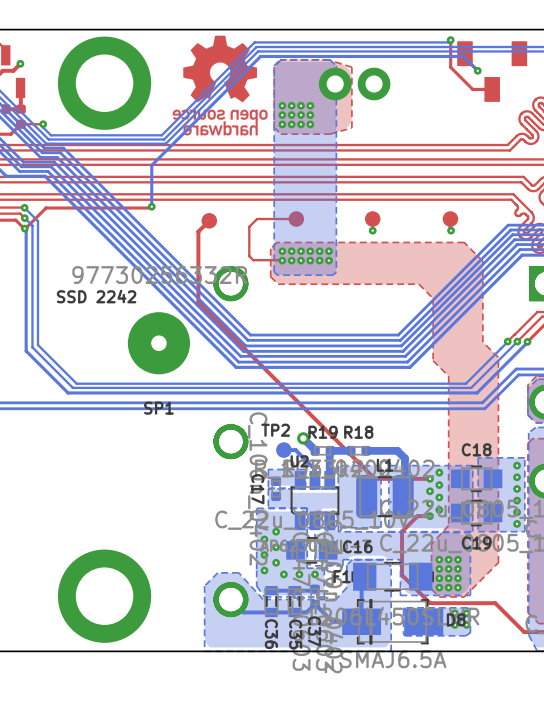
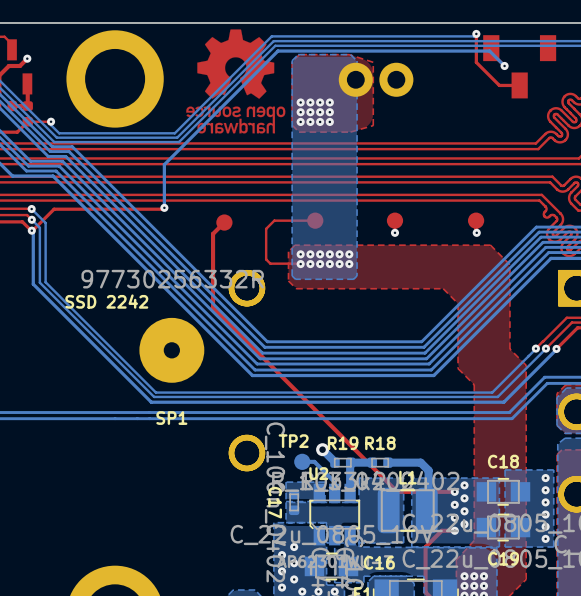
bottom track: (32, 278) (32, 347) (72, 387) (141, 387) -> (39, 282) (154, 396)
bottom track: (37, 278) (37, 345) (76, 383) (143, 383) -> (45, 282) (155, 392)
bottom track: (26, 279) (26, 351) (68, 392) (139, 392) -> (33, 284) (151, 402)

